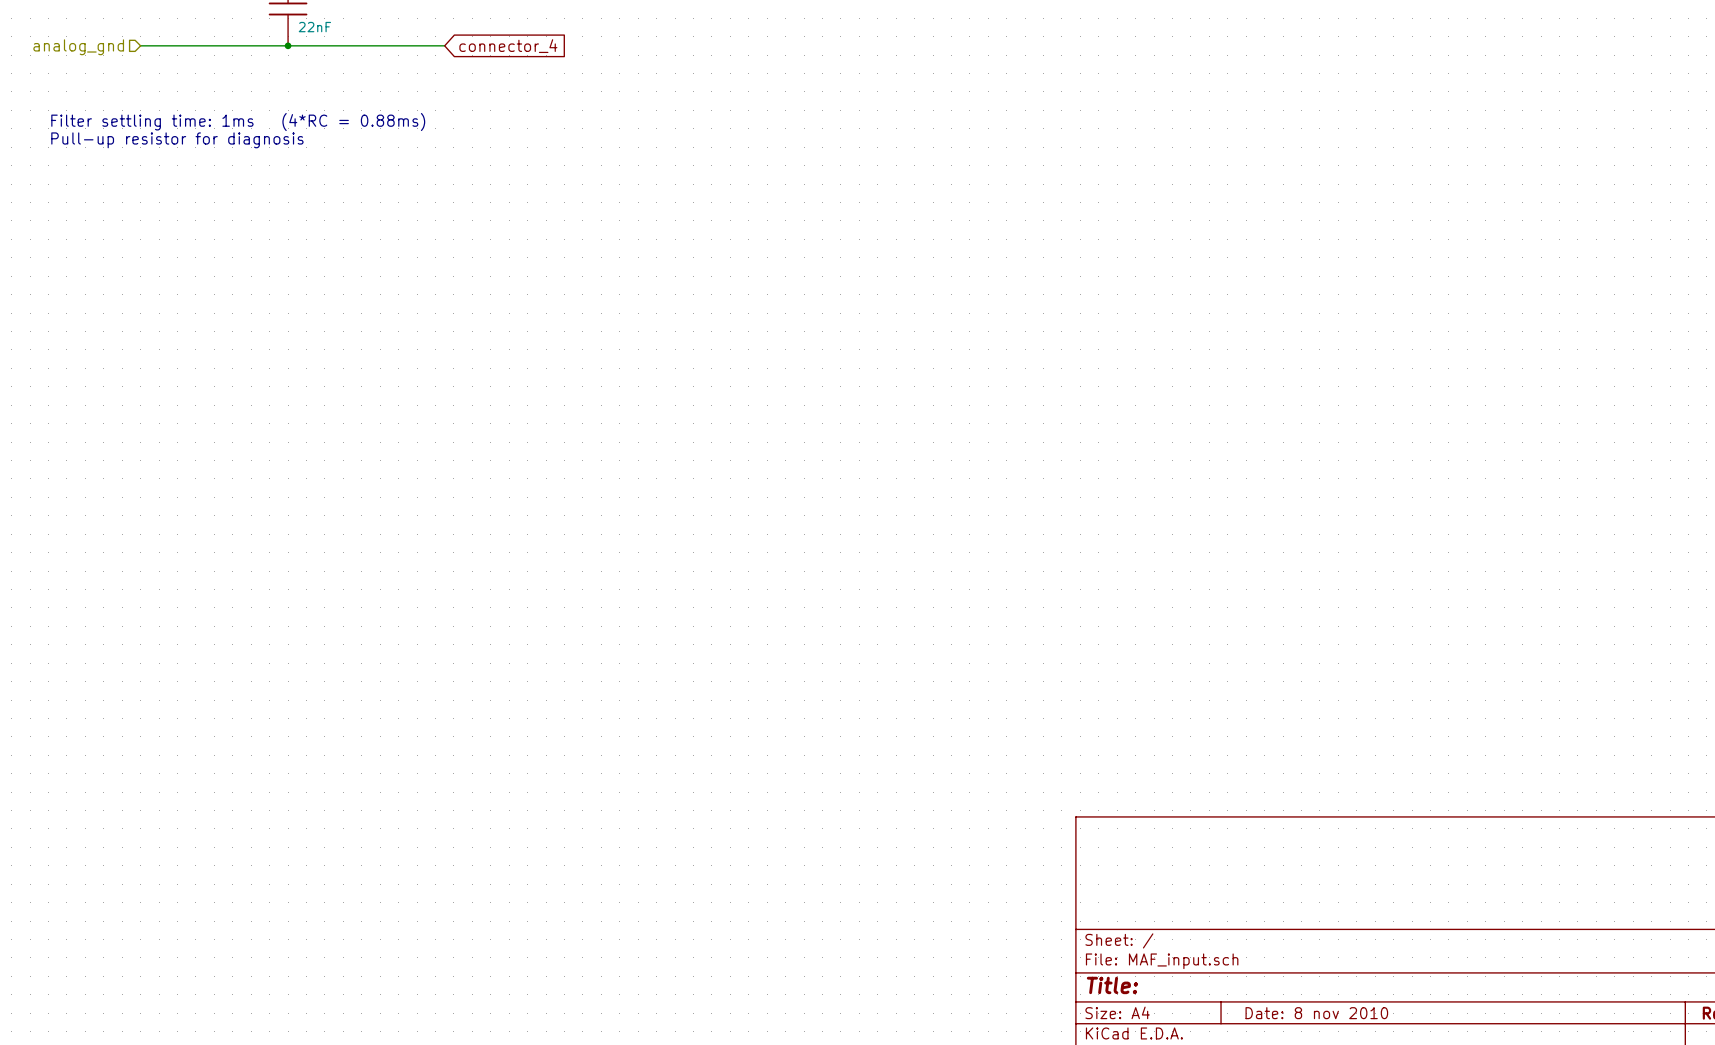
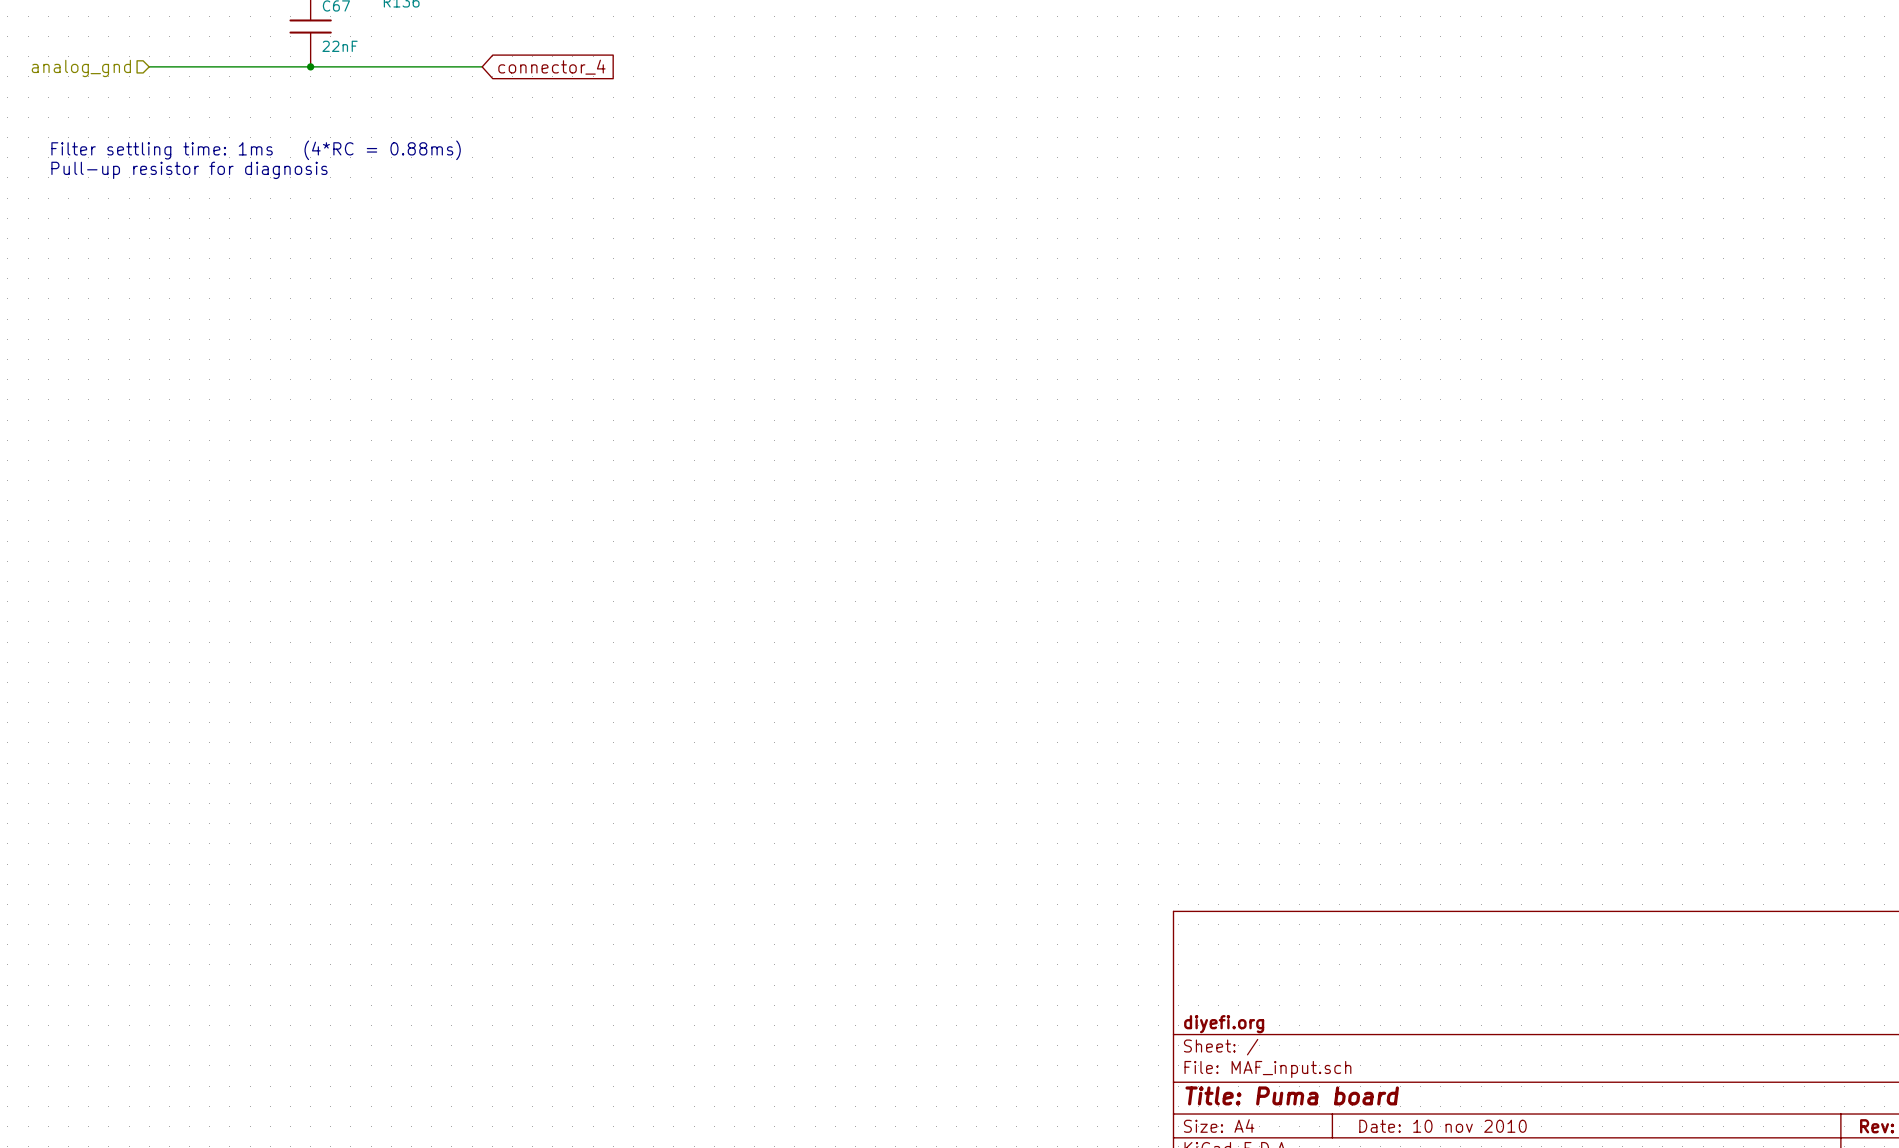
title block: none -> diyefi.org (1224, 1024)
title block: Title: (1112, 985) -> Title: Puma board (1292, 1095)
title block: Date: 8 nov 2010 (1316, 1013) -> Date: 10 nov 2010 (1443, 1126)

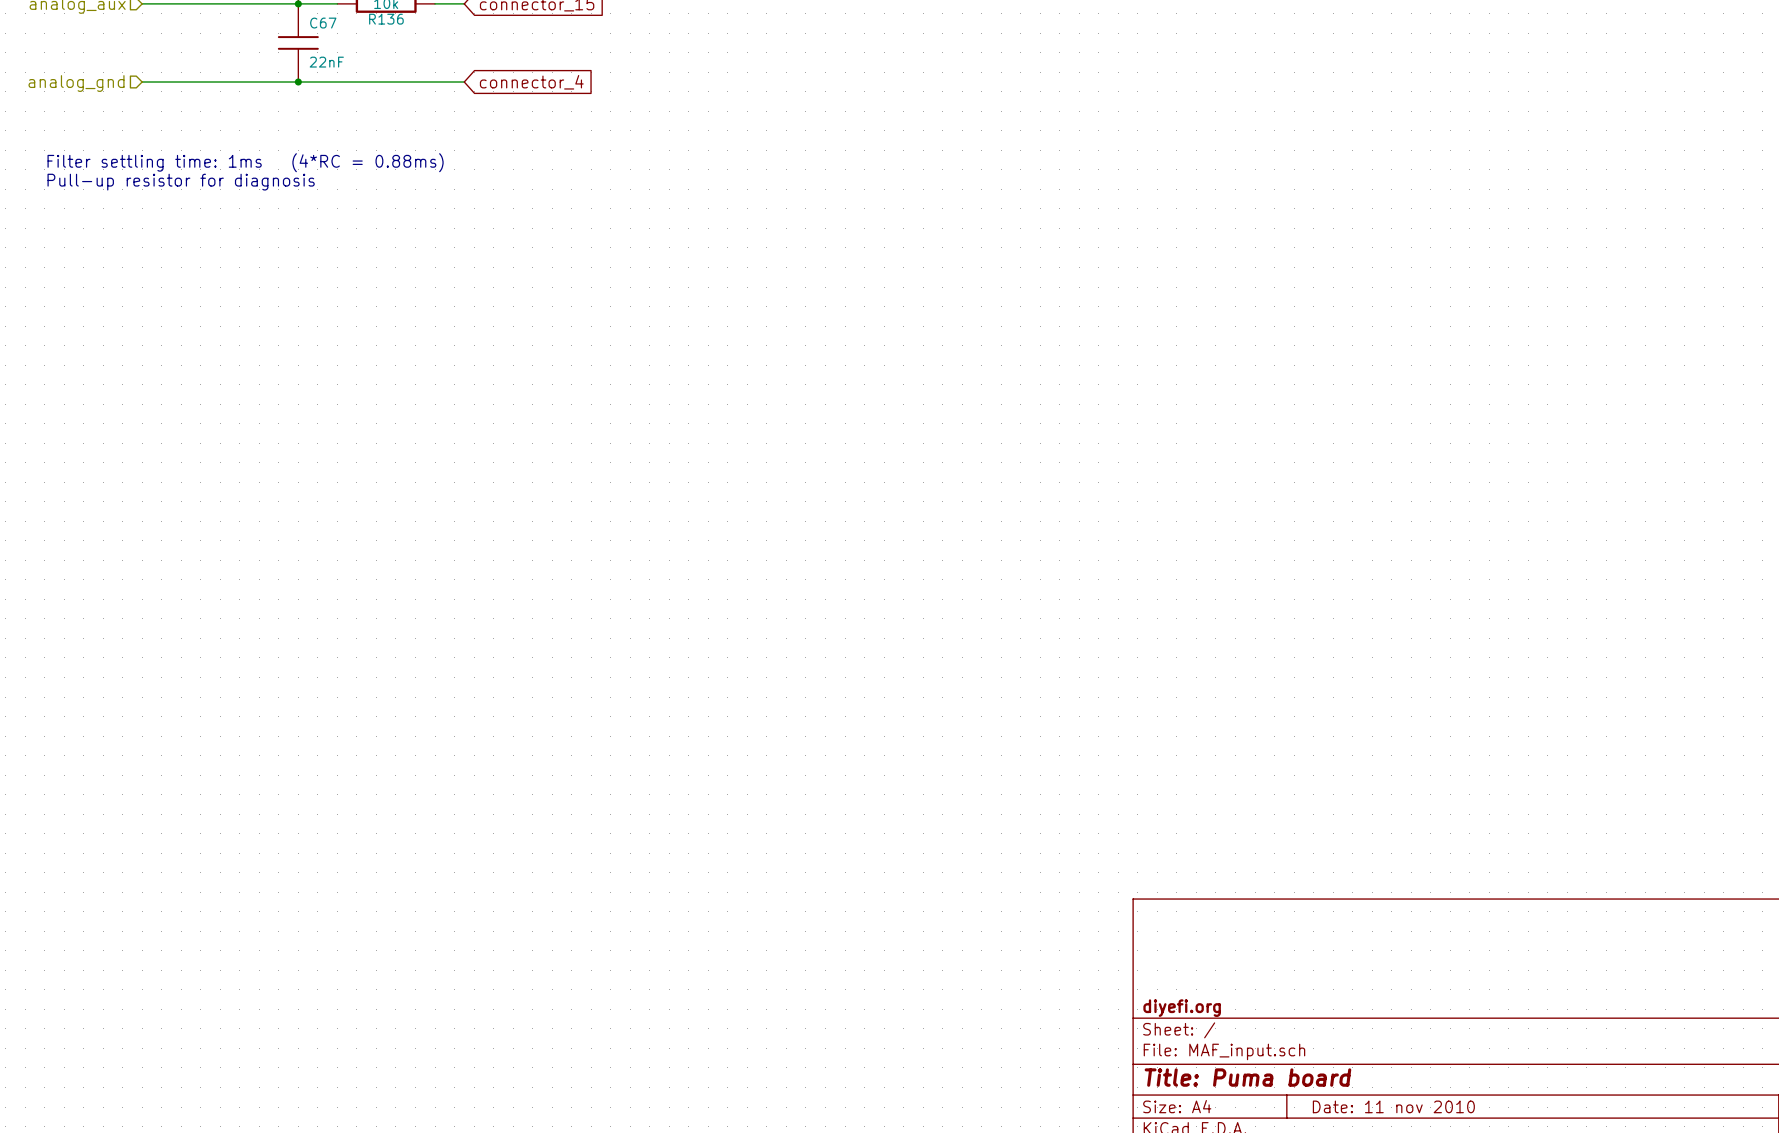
title block: Date: 10 nov 2010 (1443, 1126) -> Date: 11 nov 2010 (1393, 1106)

